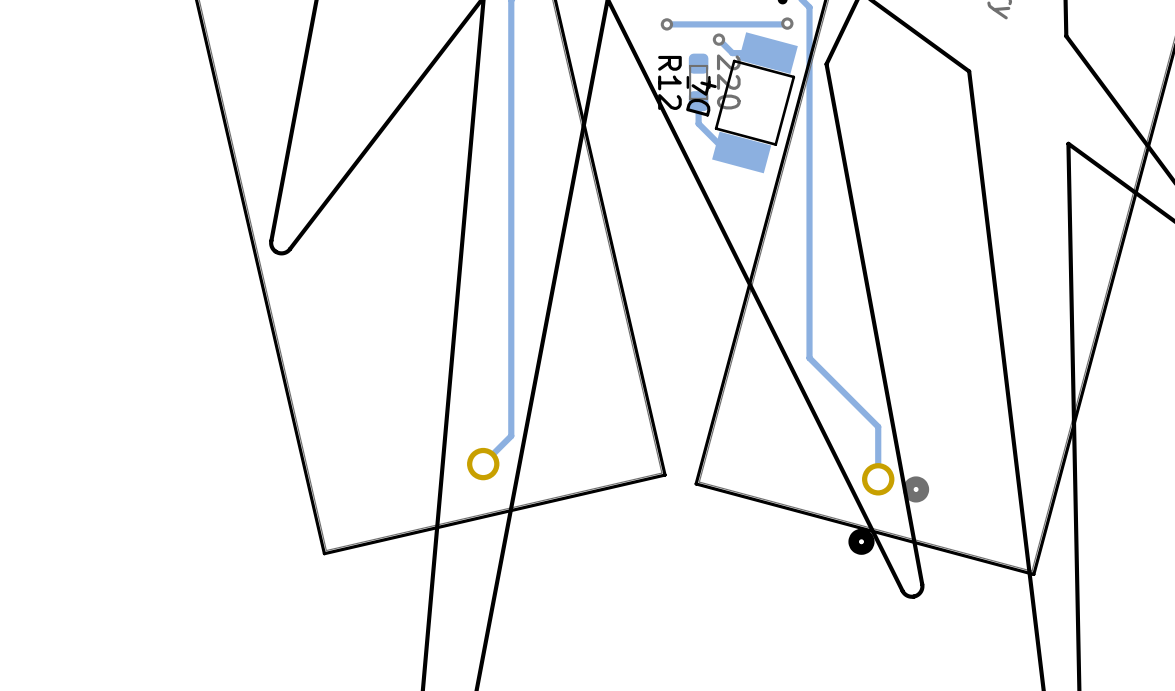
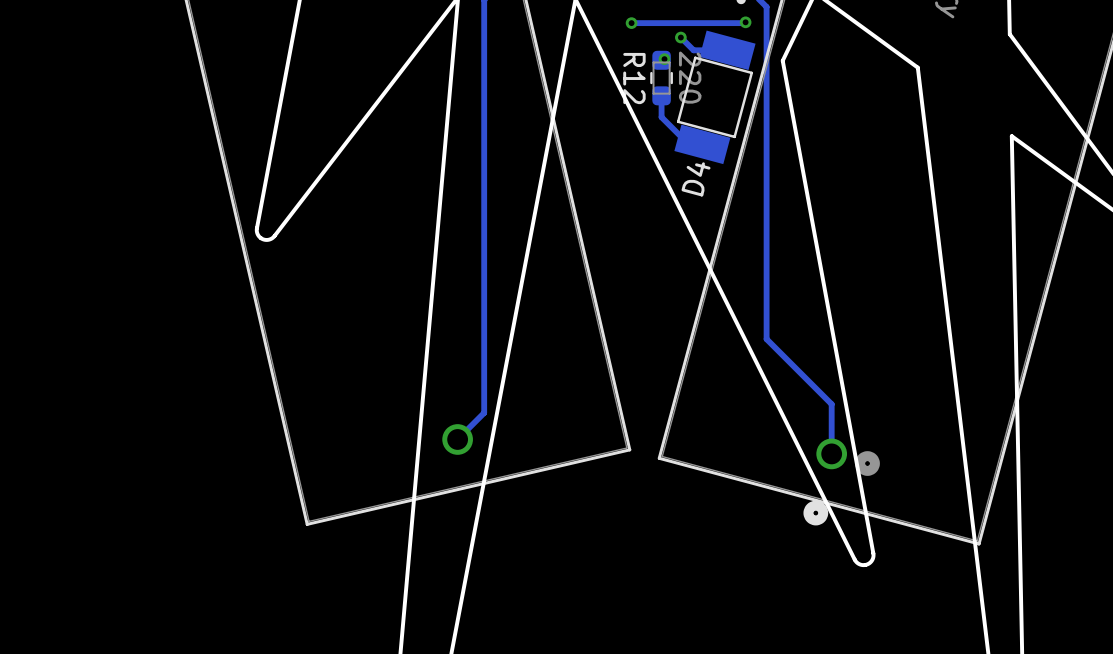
via: none -> (664, 59)
D4 name position: D4 (701, 98) -> D4 (696, 179)

